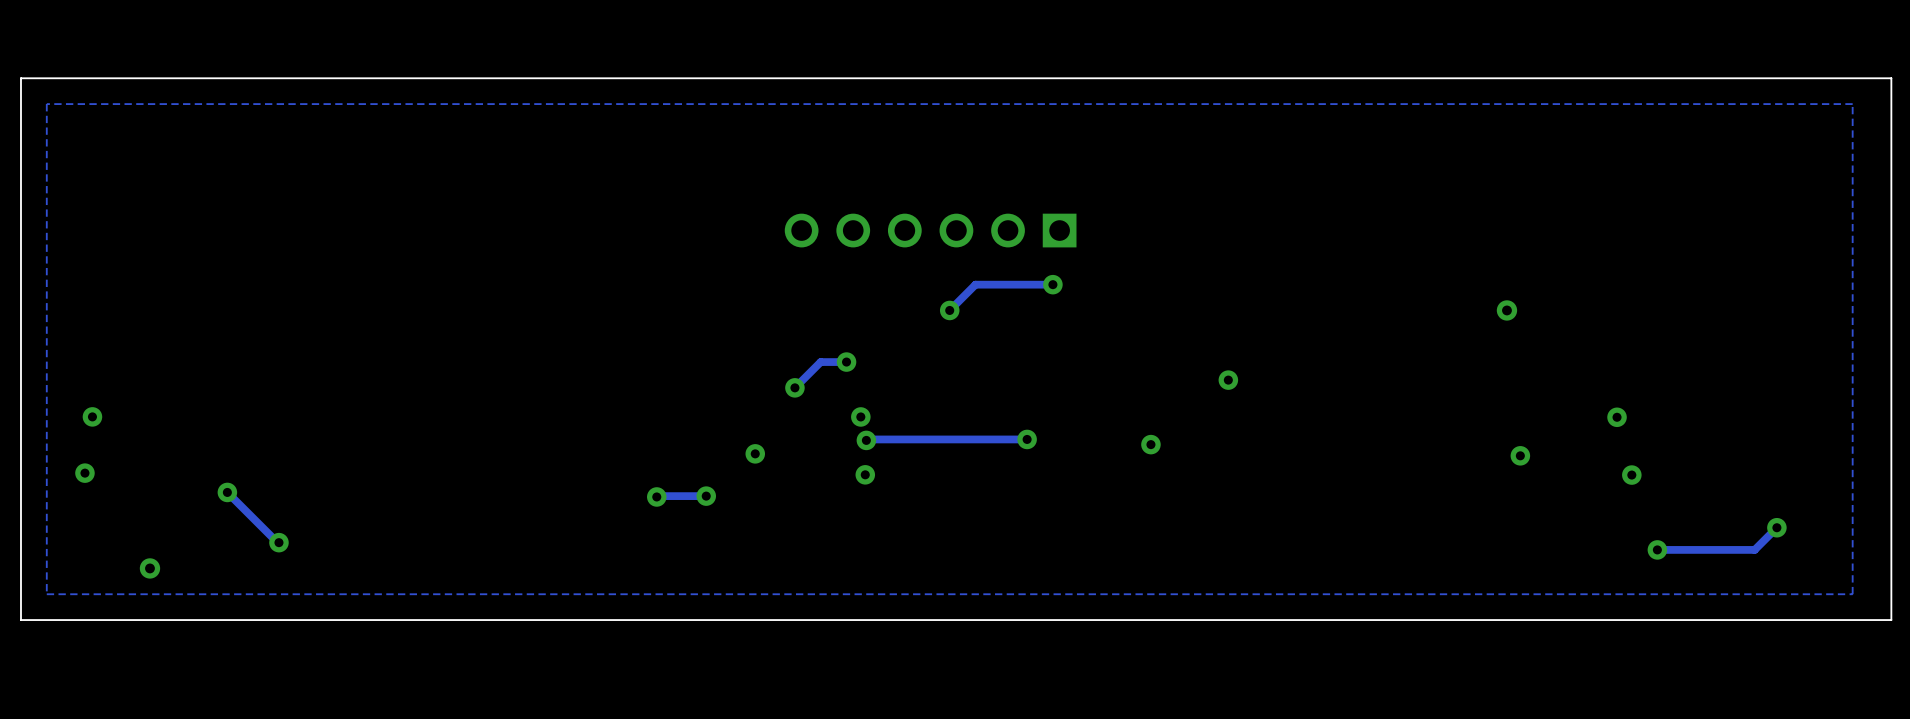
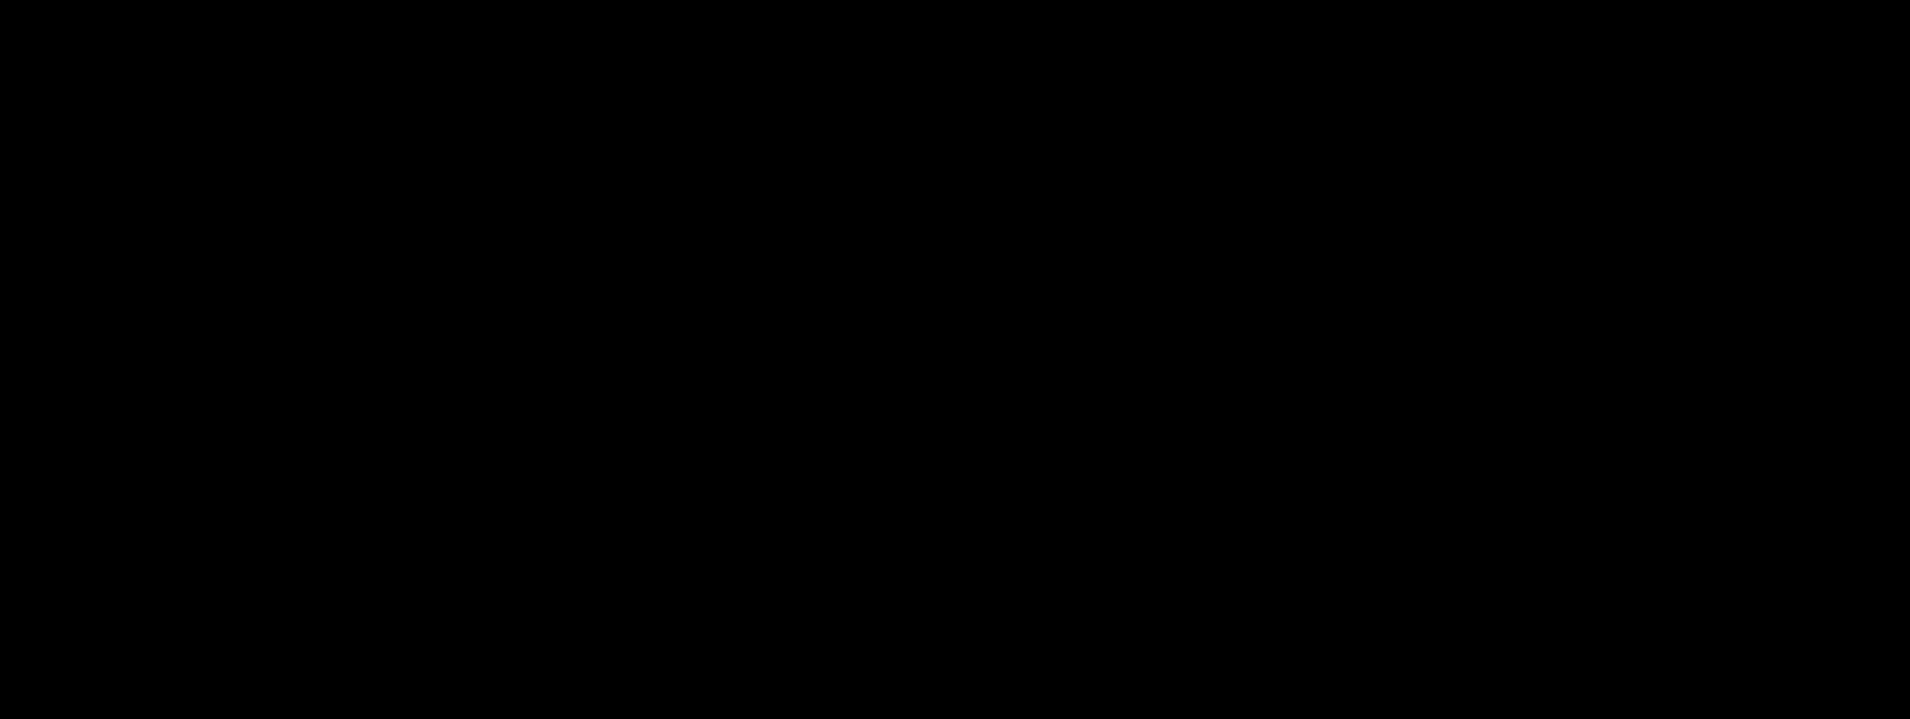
board edge: (1891, 78) (20, 78) (20, 620) (1891, 620) (1891, 78) -> none
zone outline: (1852, 104) (46, 104) (46, 594) (1852, 594) (1852, 104) -> none
part: (930, 230) -> none
track: (1052, 284) (975, 284) (949, 310) -> none
via: (1052, 284) -> none
via: (949, 310) -> none
via: (1506, 310) -> none
track: (846, 362) (820, 362) (794, 387) -> none
via: (846, 362) -> none
via: (1228, 380) -> none
via: (794, 387) -> none
via: (92, 416) -> none
via: (860, 416) -> none
via: (1617, 417) -> none
track: (1027, 439) (866, 440) -> none
via: (1027, 439) -> none
via: (866, 440) -> none
via: (1150, 444) -> none
via: (755, 453) -> none
via: (1520, 455) -> none
via: (84, 473) -> none
via: (865, 474) -> none
via: (1631, 475) -> none
track: (227, 492) (278, 542) -> none
via: (227, 492) -> none
via: (656, 496) -> none
track: (706, 496) (656, 496) -> none
via: (706, 496) -> none
track: (1776, 527) (1754, 549) (1657, 549) -> none
via: (1776, 527) -> none
via: (278, 542) -> none
via: (1657, 549) -> none
via: (149, 568) -> none

